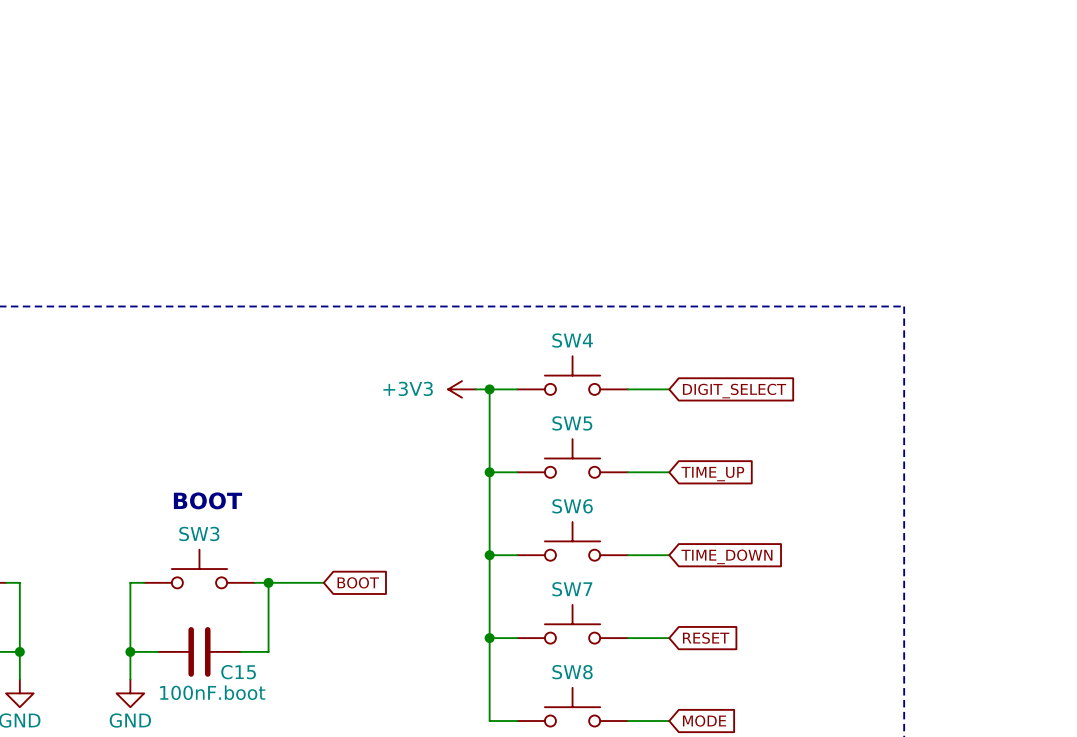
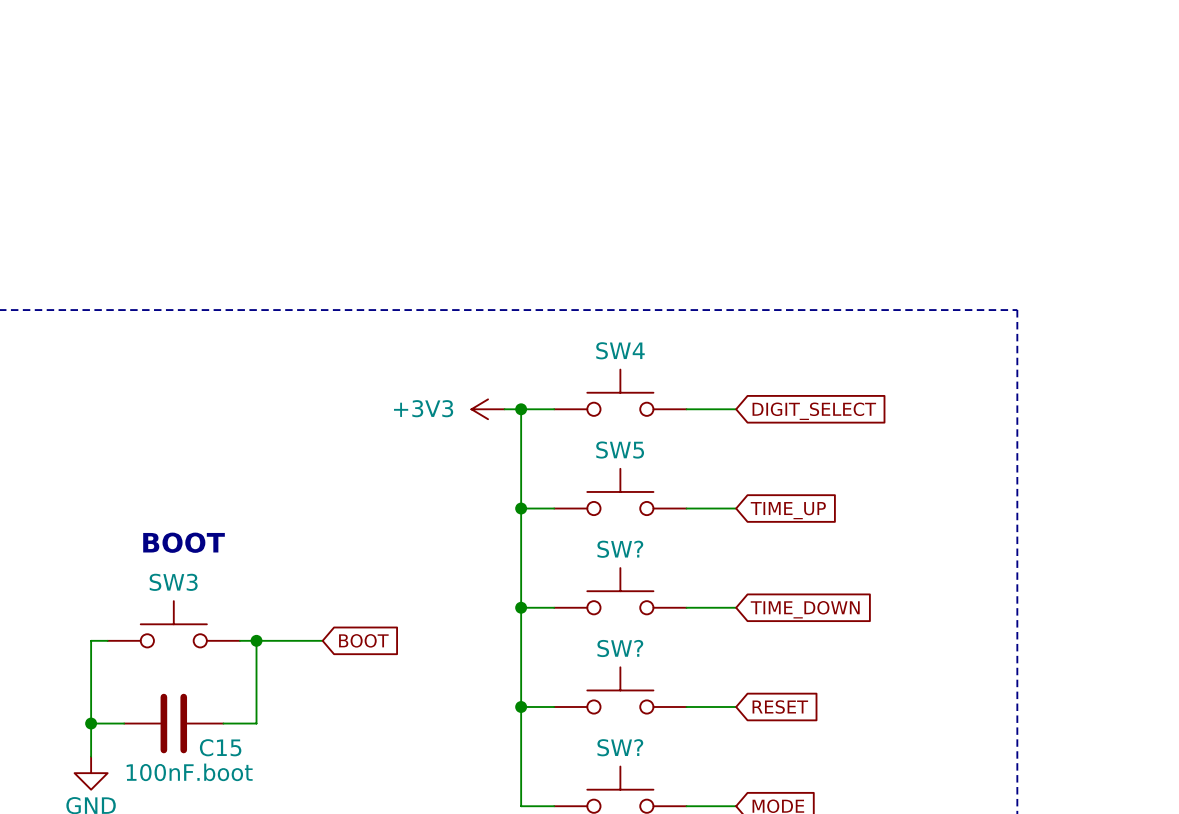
SW6 name: SW6 (572, 506) -> SW? (620, 549)
SW7 name: SW7 (572, 589) -> SW? (620, 648)
SW8 name: SW8 (572, 672) -> SW? (620, 747)

